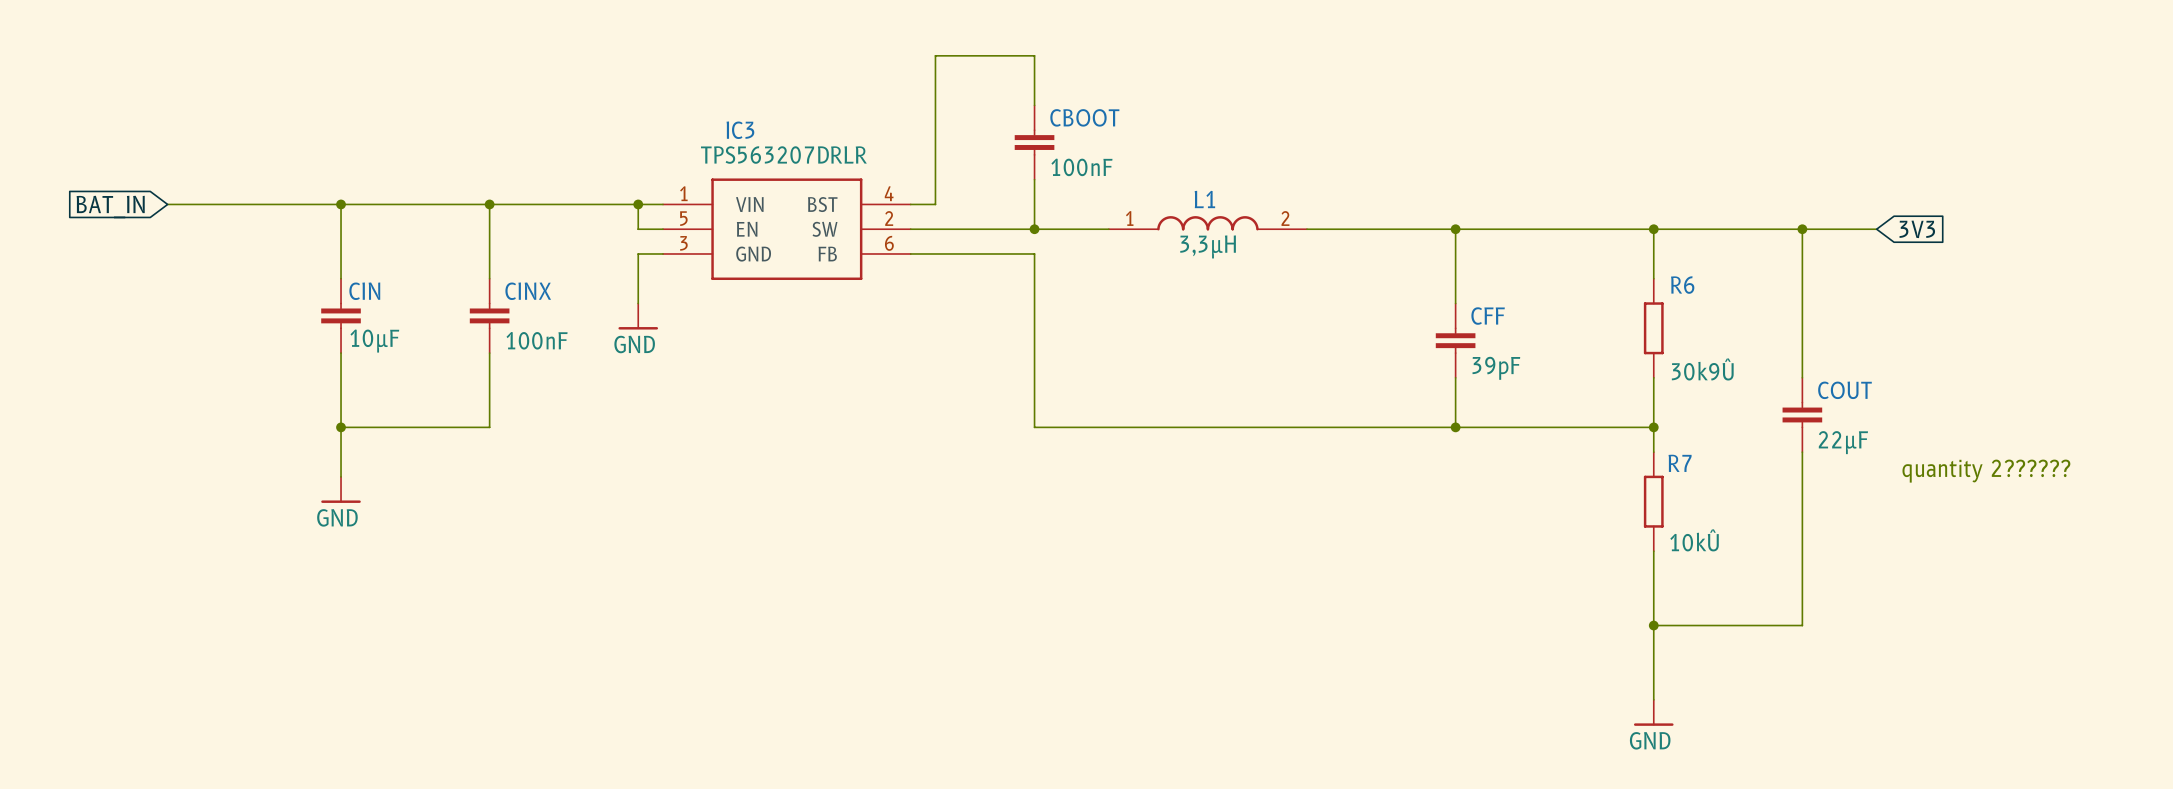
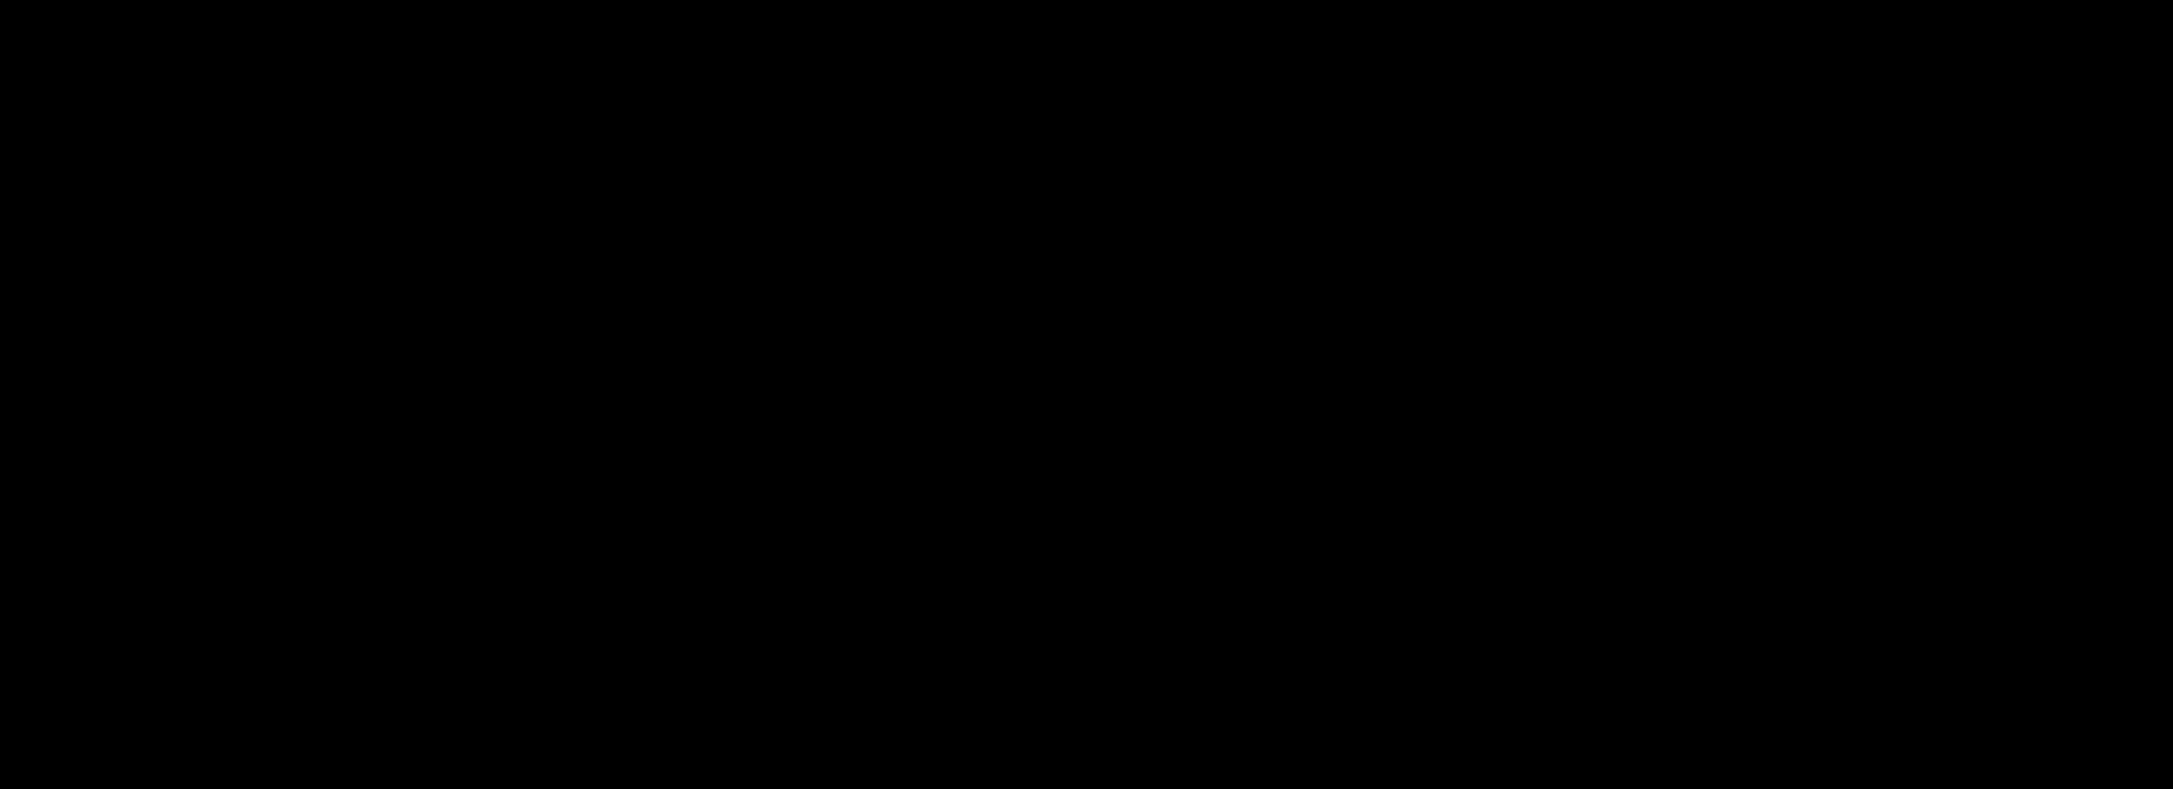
wire: (1034, 105) (1034, 55) (935, 55) (935, 204) (910, 204) -> none
CBOOT: 100nF (1034, 142) -> none
wire: (1034, 179) (1034, 229) -> none
wire: (167, 204) (663, 204) -> none
wire: (341, 204) (341, 278) -> none
junction: (341, 204) -> none
wire: (489, 204) (489, 278) -> none
junction: (489, 204) -> none
wire: (638, 204) (638, 229) (663, 229) -> none
junction: (638, 204) -> none
global label: BAT_IN (110, 207) -> none
L1: 3,3µH (1207, 223) -> none
IC3: TPS563207DRLR (786, 229) -> none
wire: (910, 229) (1108, 229) -> none
junction: (1034, 229) -> none
wire: (1307, 229) (1876, 229) -> none
wire: (1455, 229) (1455, 303) -> none
junction: (1455, 229) -> none
wire: (1653, 229) (1653, 278) -> none
junction: (1653, 229) -> none
wire: (1802, 229) (1802, 377) -> none
junction: (1802, 229) -> none
global label: 3V3 (1917, 229) -> none
wire: (663, 253) (638, 253) (638, 303) -> none
wire: (910, 253) (1034, 253) (1034, 427) (1653, 427) -> none
CIN: 10µF (341, 315) -> none
CINX: 100nF (489, 315) -> none
power symbol: GND (638, 316) -> none
R6: 30k9Û (1653, 328) -> none
CFF: 39pF (1455, 340) -> none
wire: (341, 353) (341, 476) -> none
wire: (489, 353) (489, 427) (341, 427) -> none
wire: (1455, 377) (1455, 427) -> none
wire: (1653, 377) (1653, 452) -> none
COUT: 22µF (1802, 414) -> none
junction: (341, 427) -> none
junction: (1455, 427) -> none
junction: (1653, 427) -> none
wire: (1802, 452) (1802, 625) (1653, 625) -> none
text: quantity 2?????? (1986, 471) -> none
power symbol: GND (341, 489) -> none
R7: 10kÛ (1653, 501) -> none
wire: (1653, 551) (1653, 699) -> none
junction: (1653, 625) -> none
power symbol: GND (1653, 712) -> none

